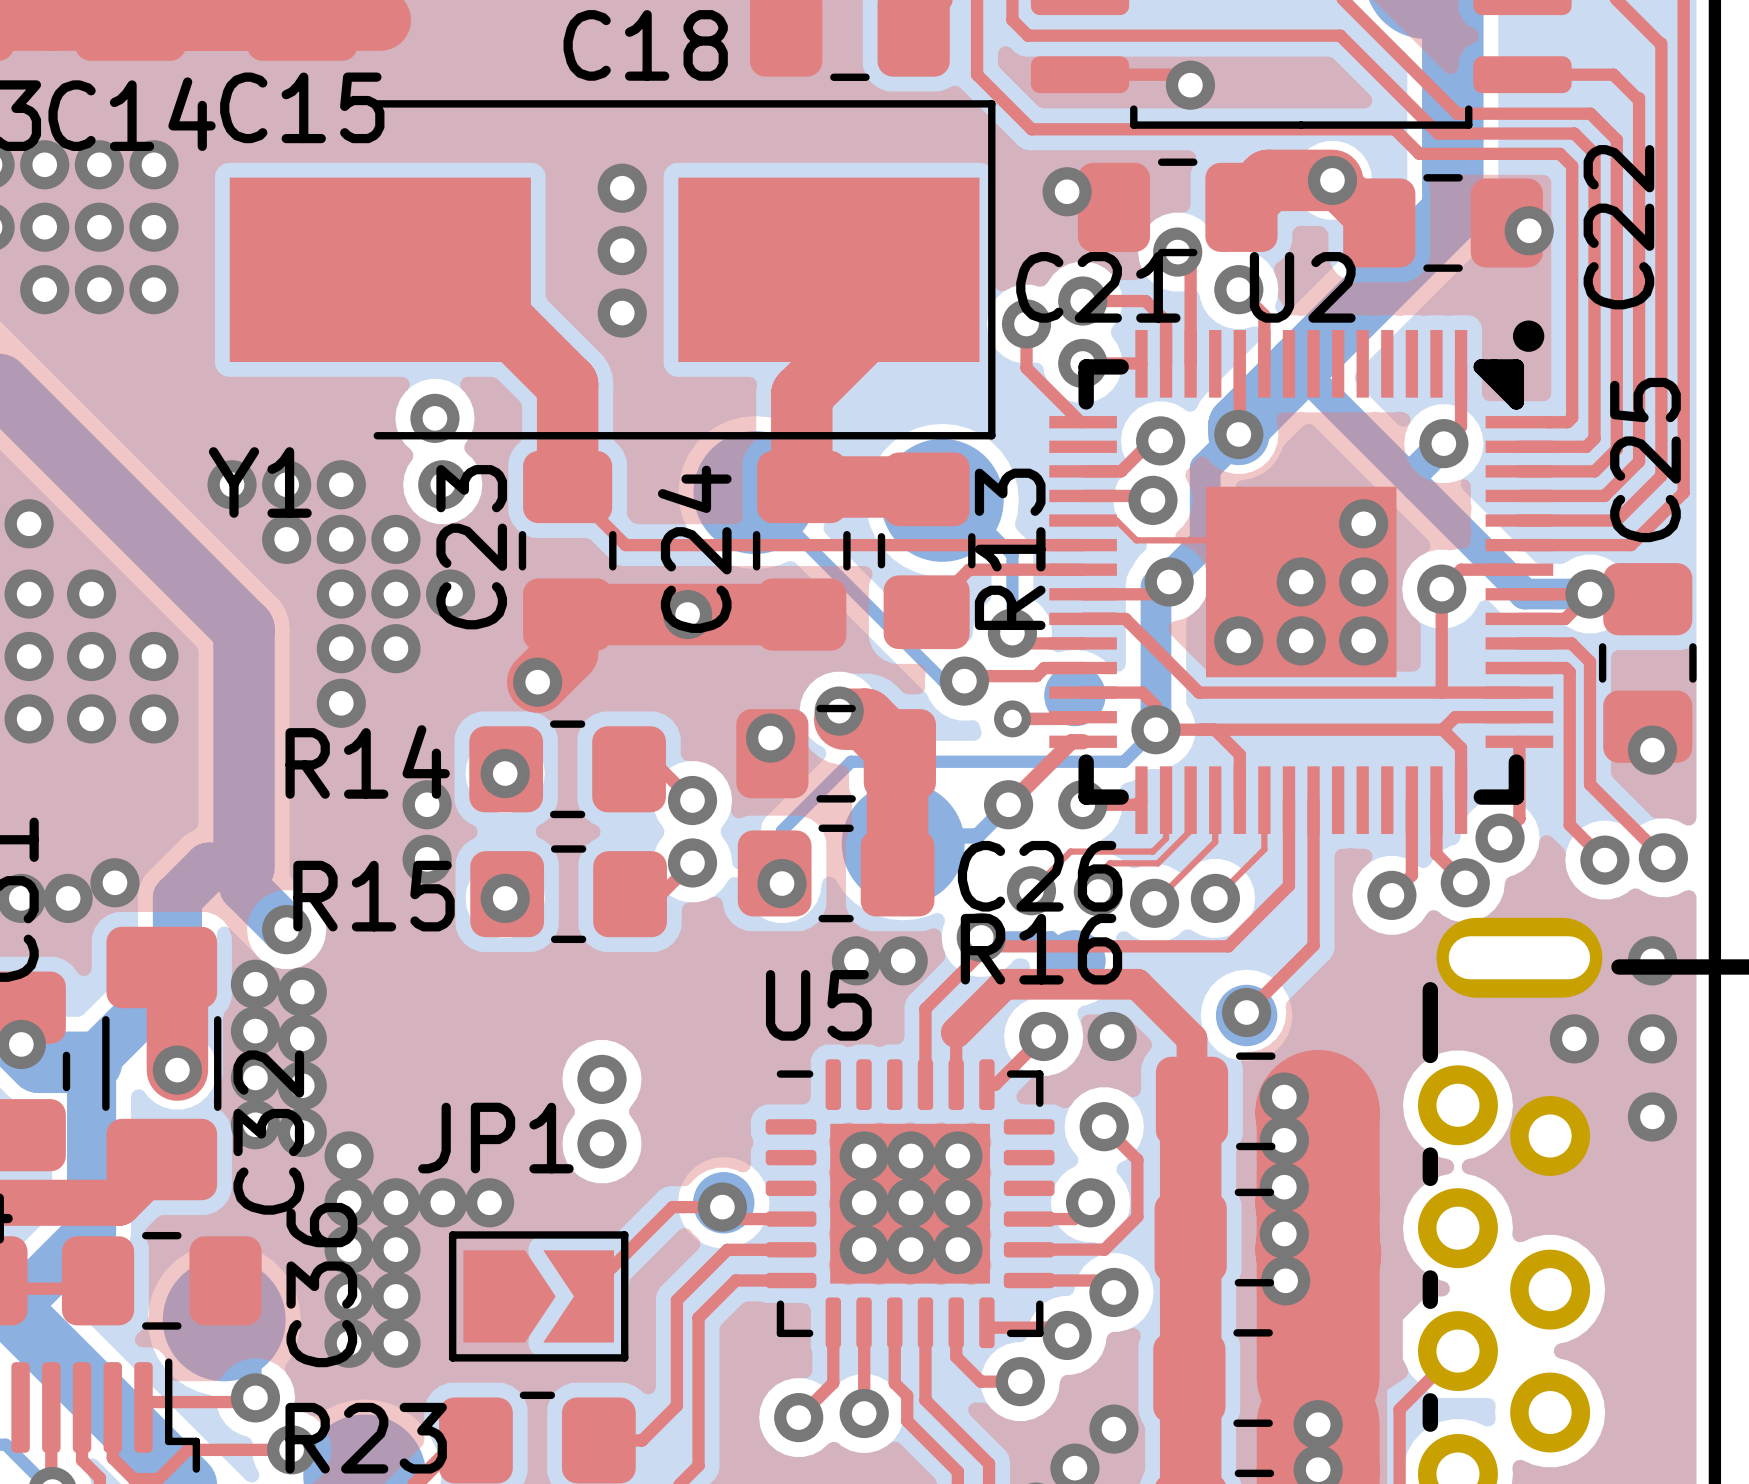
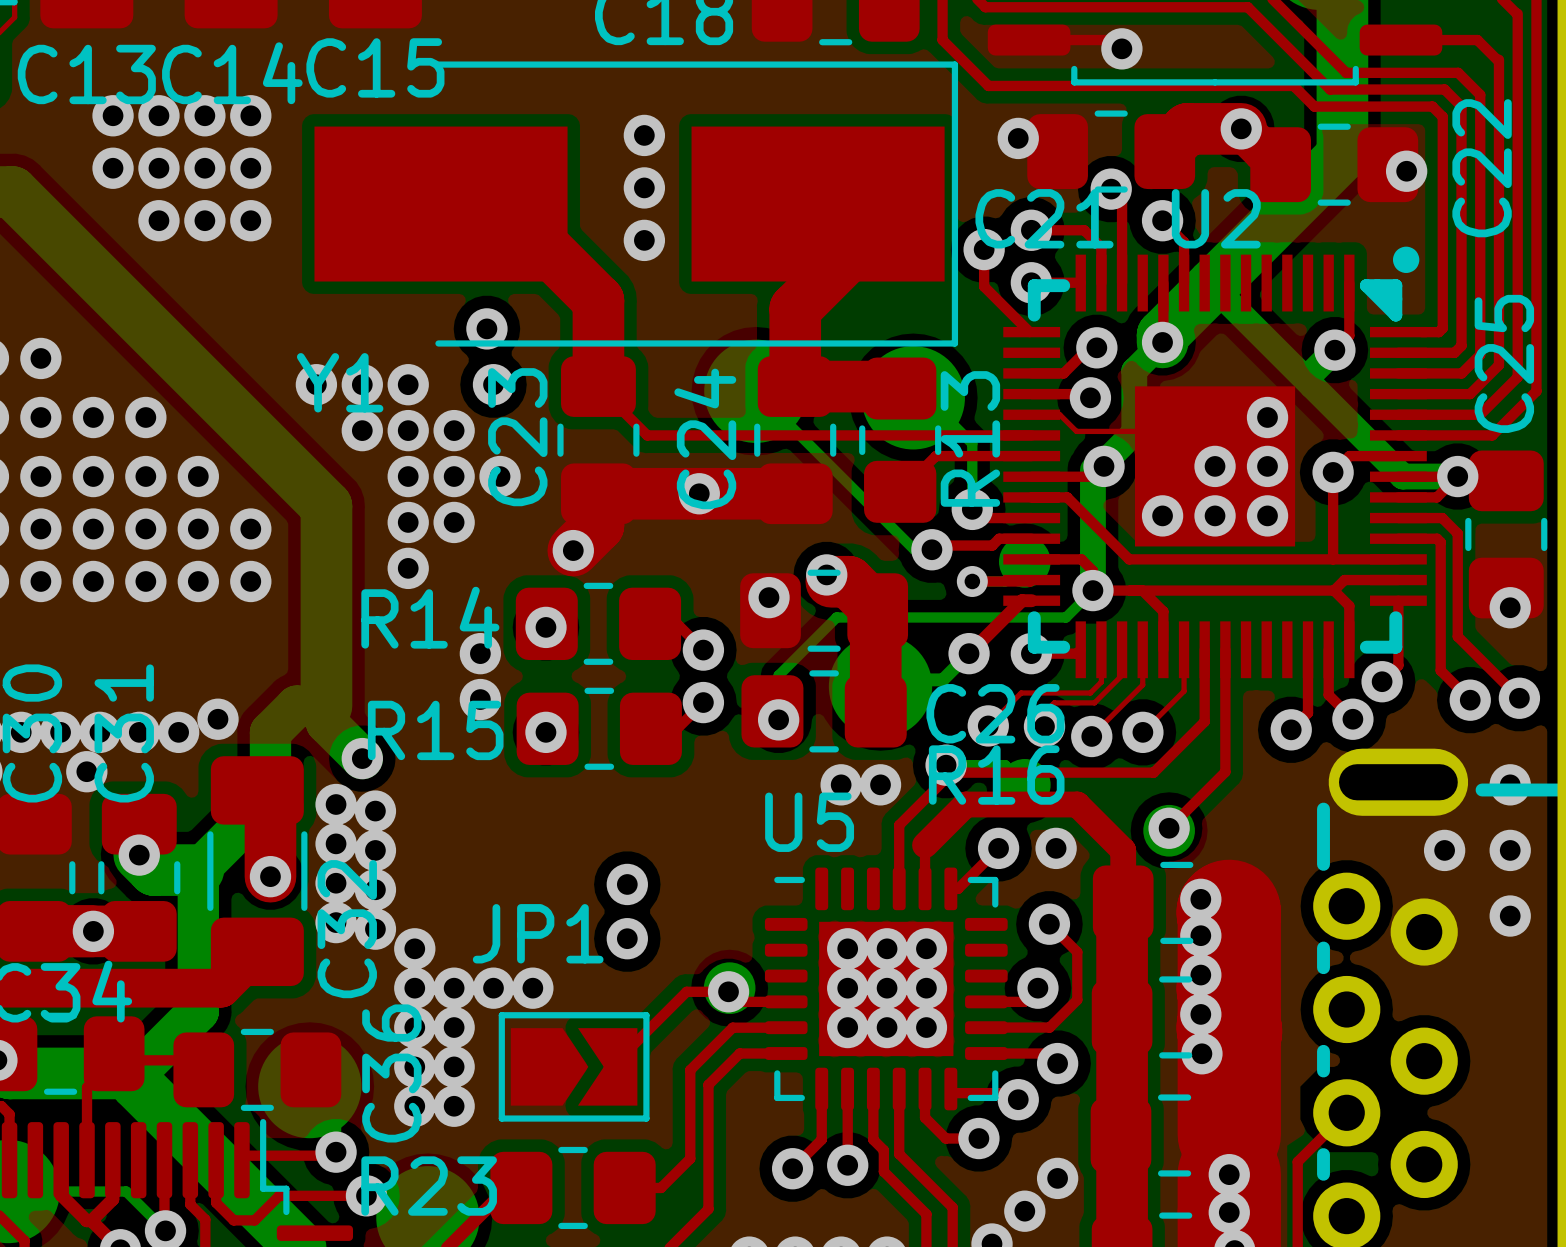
C36 position: (161, 1280) -> (257, 1069)

